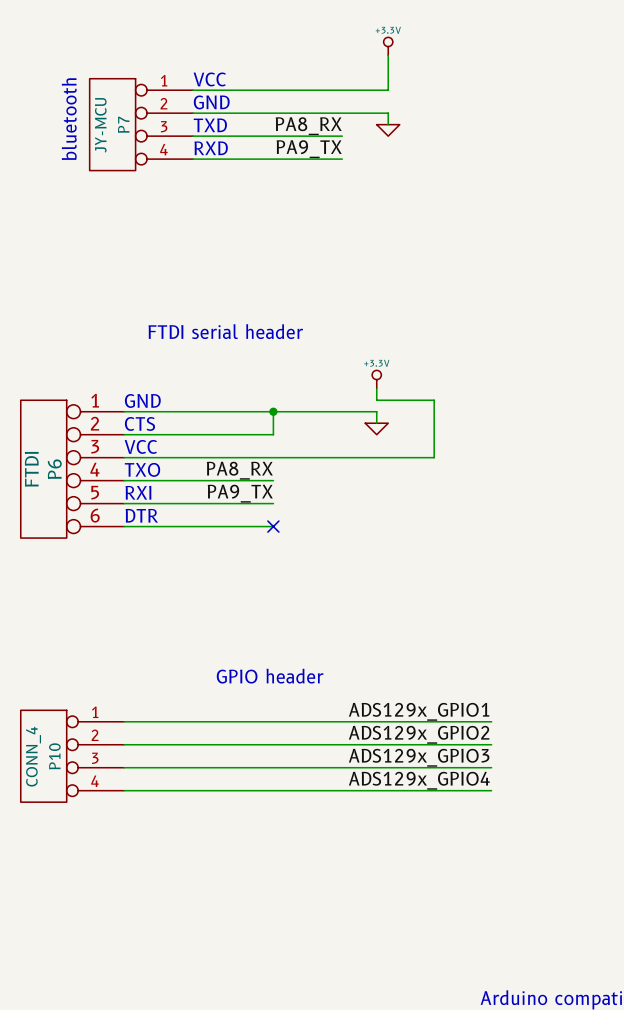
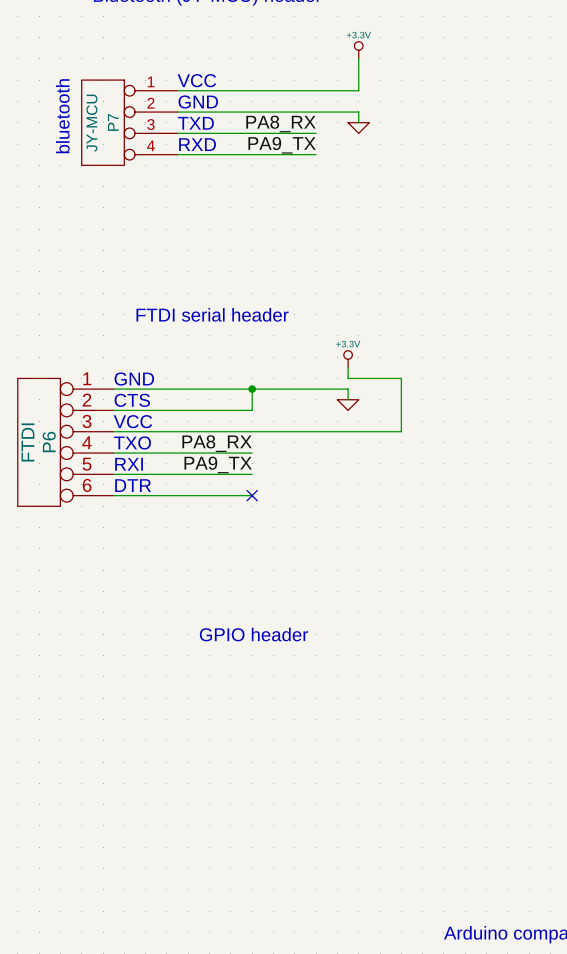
label: ADS129x_GPIO1 (419, 711) -> none
wire: (124, 721) (491, 721) -> none
label: ADS129x_GPIO2 (419, 734) -> none
wire: (124, 744) (491, 744) -> none
P10: CONN_4 (72, 756) -> none
label: ADS129x_GPIO3 (419, 757) -> none
wire: (124, 767) (491, 767) -> none
label: ADS129x_GPIO4 (419, 780) -> none
wire: (124, 790) (491, 790) -> none

